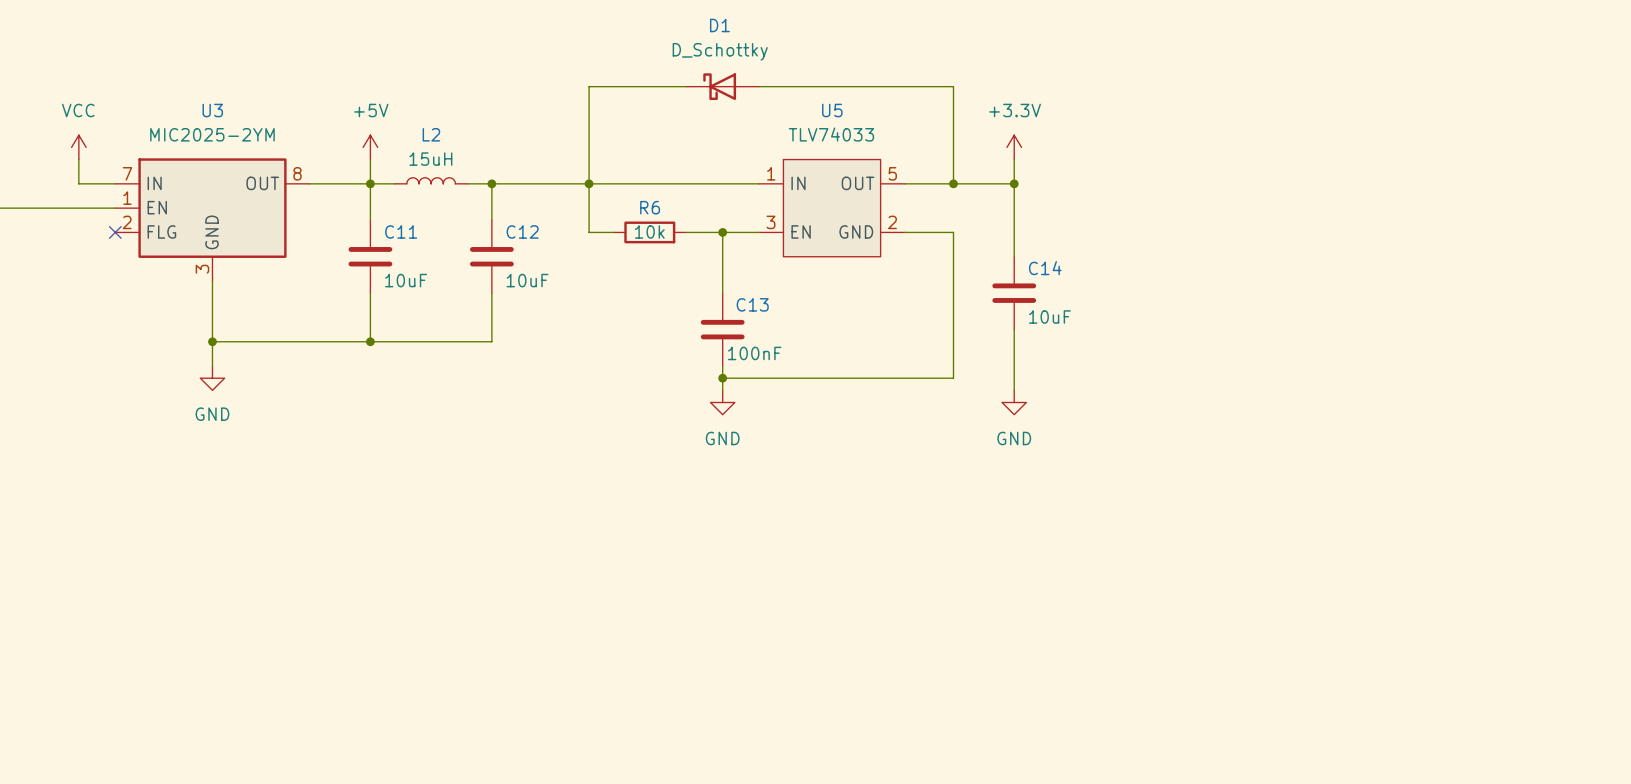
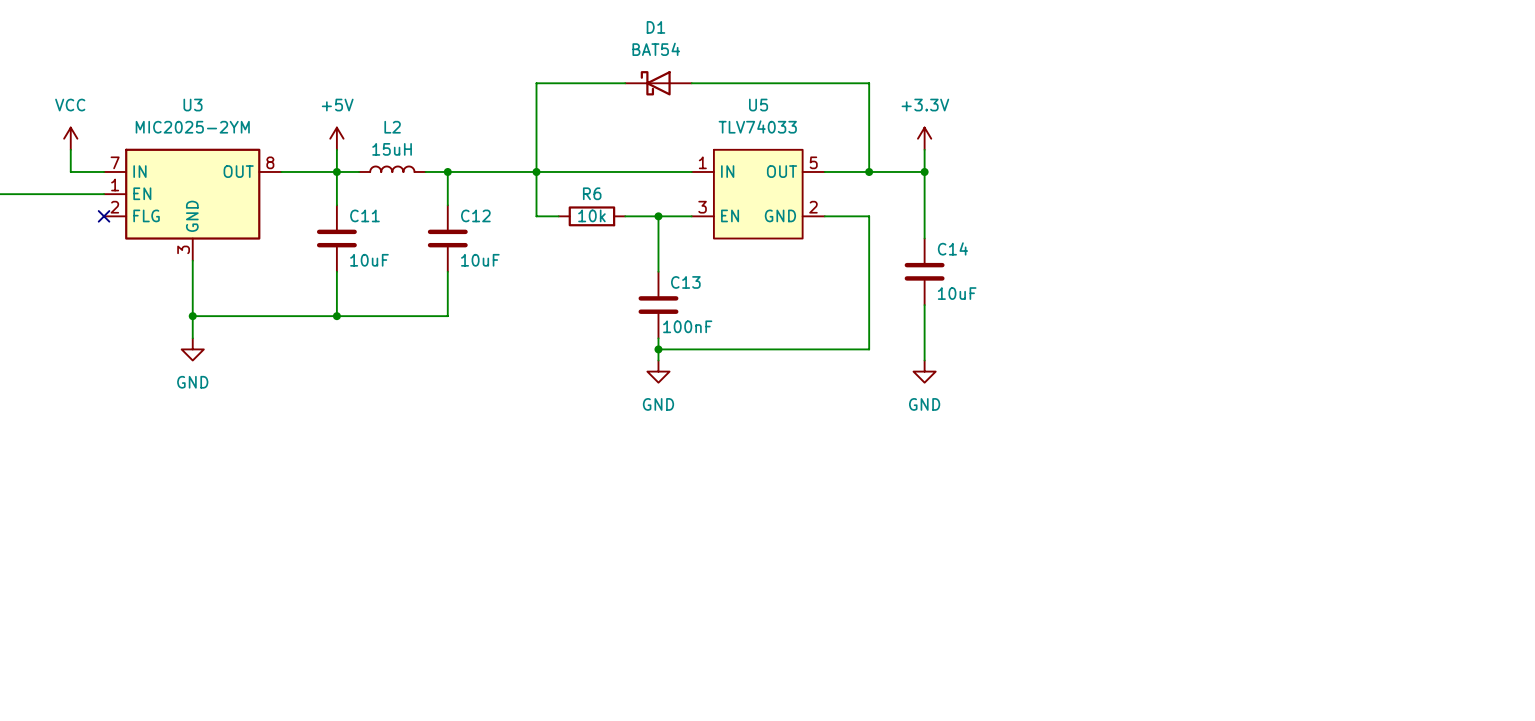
D1 value: D_Schottky (720, 51) -> BAT54 (656, 49)

